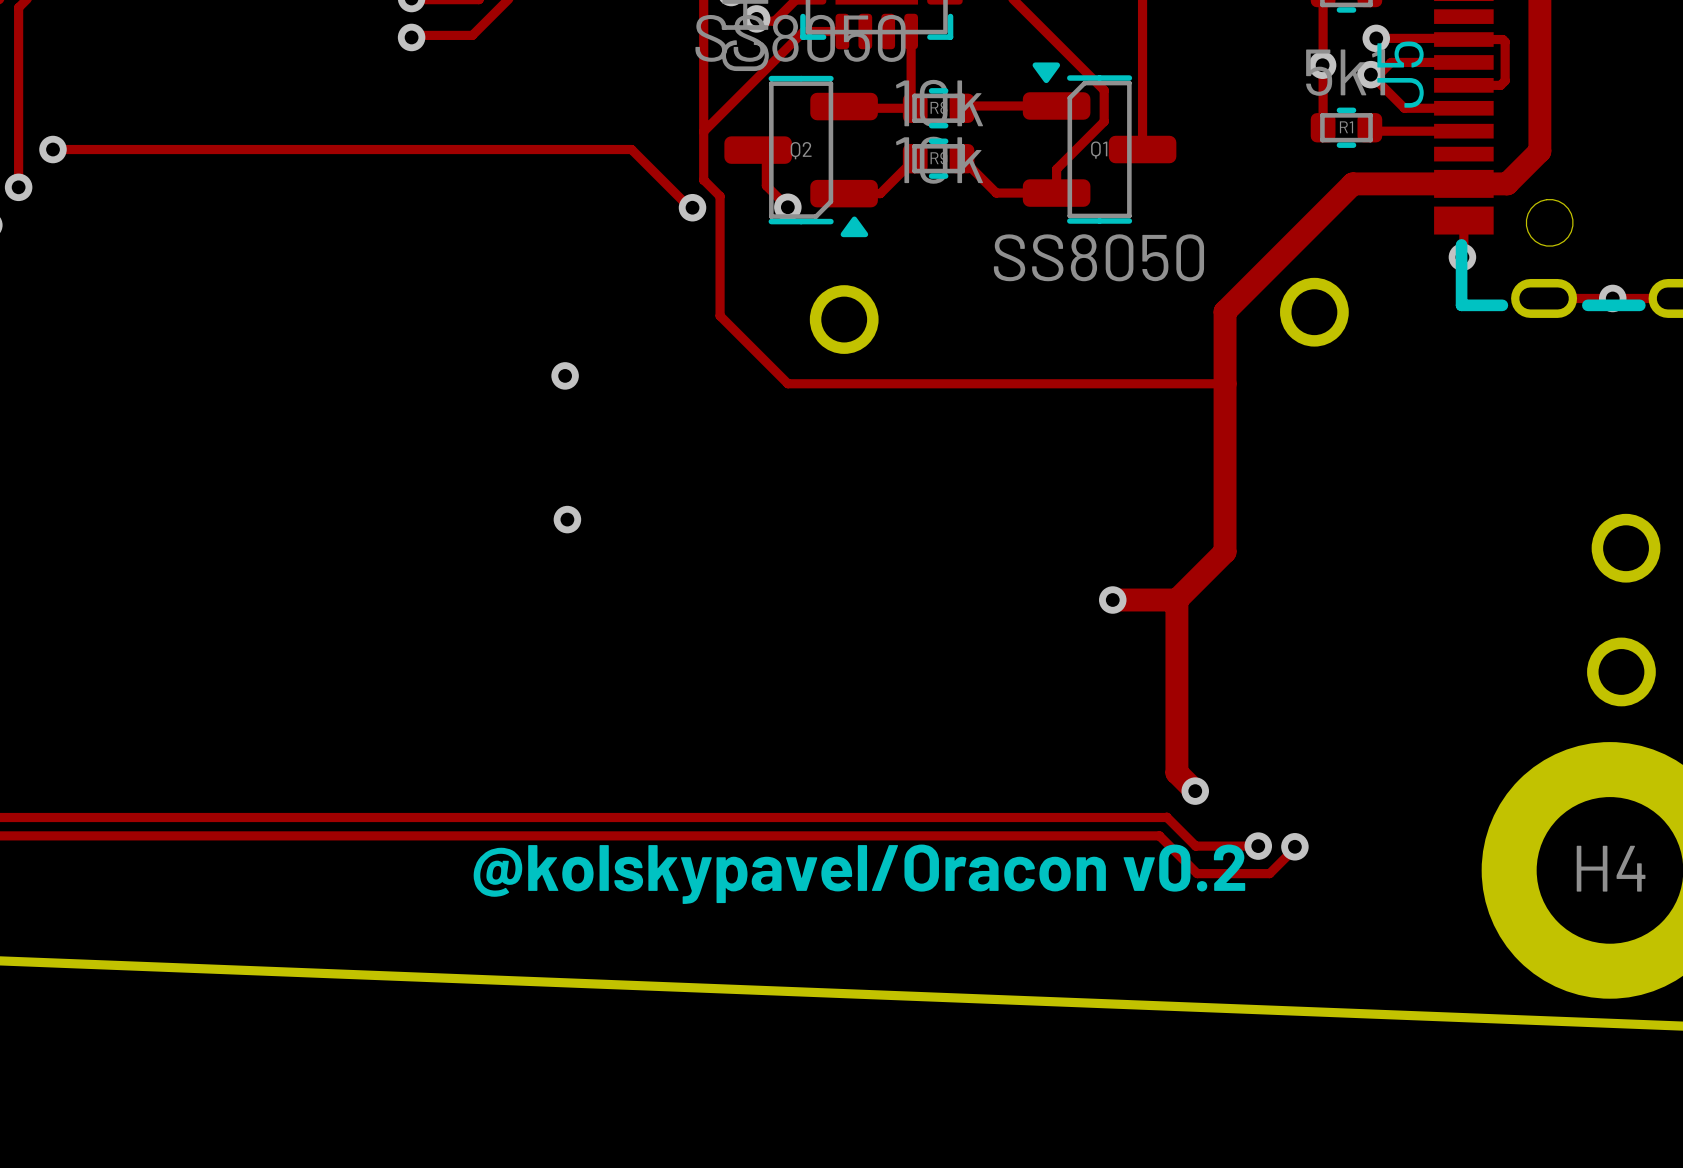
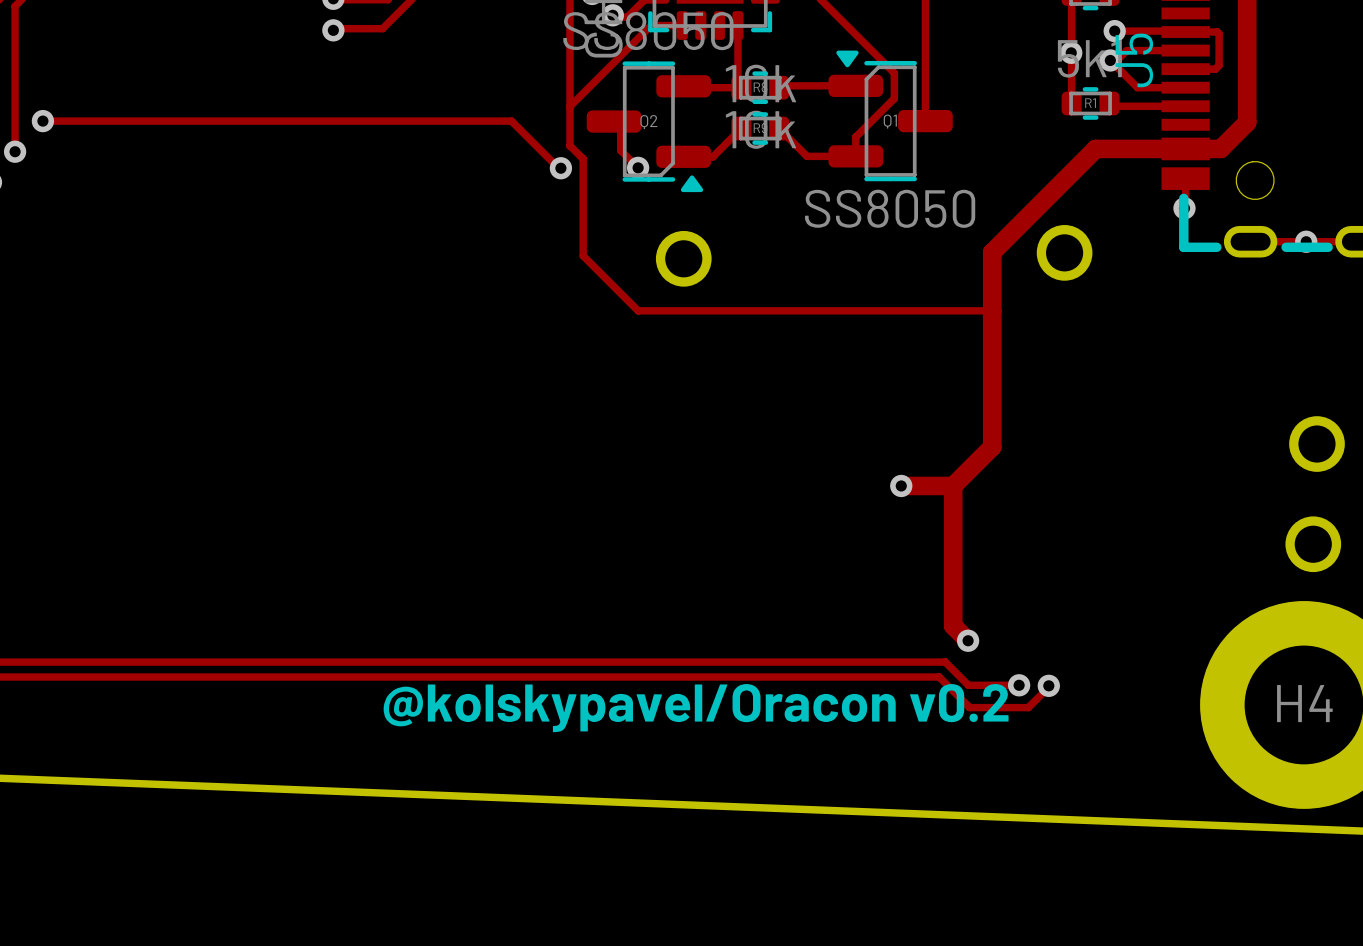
via: (565, 375) -> none
via: (567, 519) -> none

